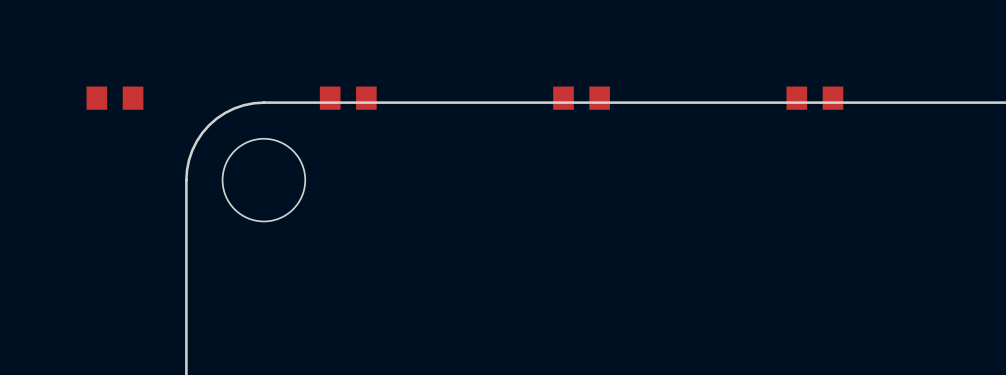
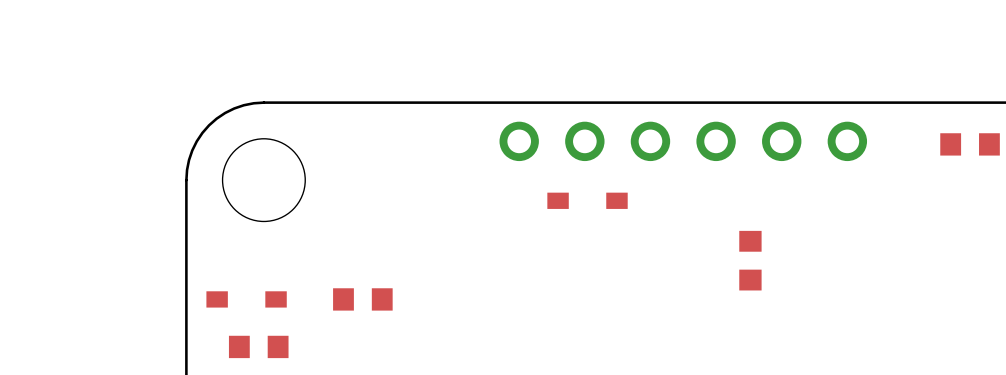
part: (114, 98) -> none
part: (348, 98) -> none
part: (581, 98) -> none
part: (814, 98) -> none
part: none -> (683, 141)
part: none -> (970, 144)
part: none -> (587, 200)
part: none -> (750, 260)
part: none -> (246, 299)
part: none -> (362, 299)
part: none -> (258, 346)

